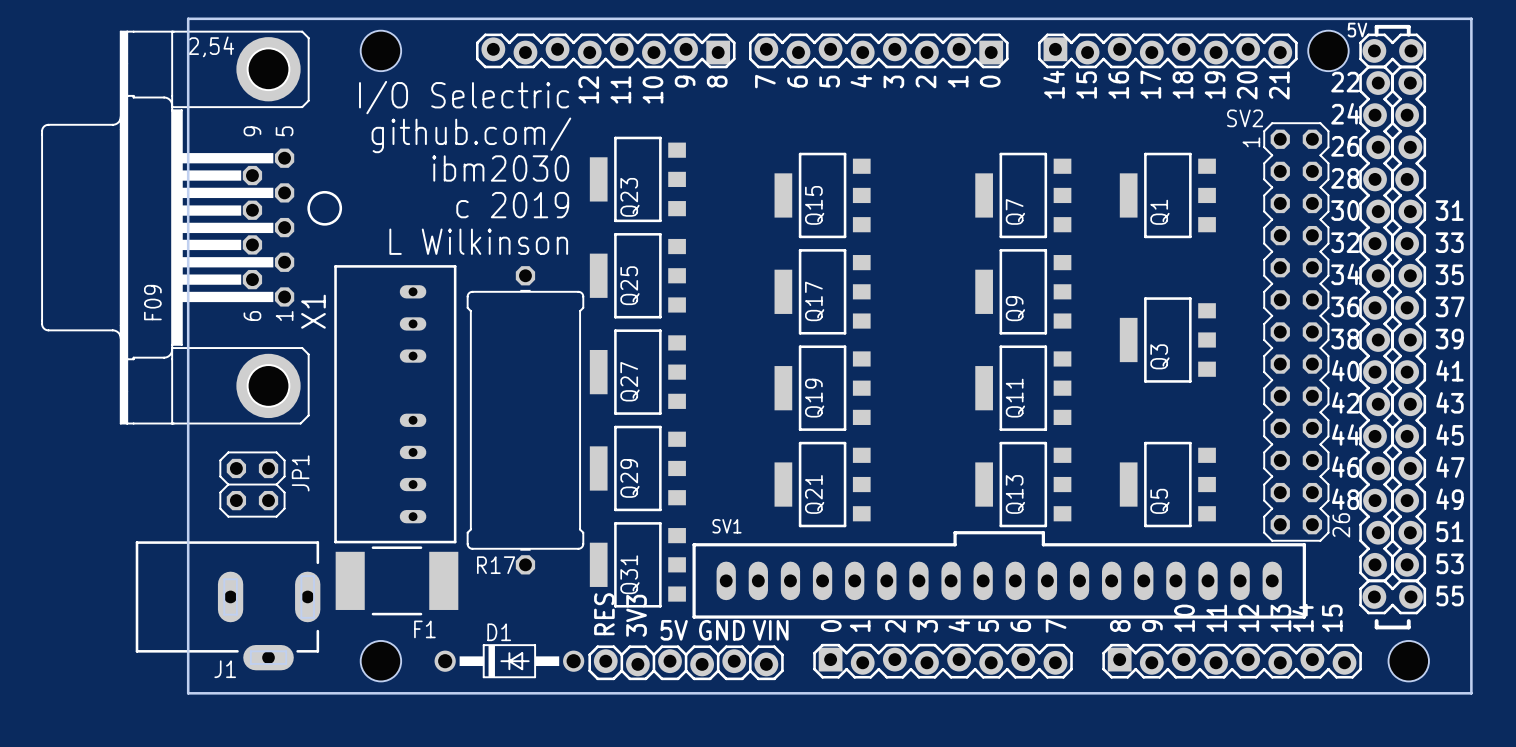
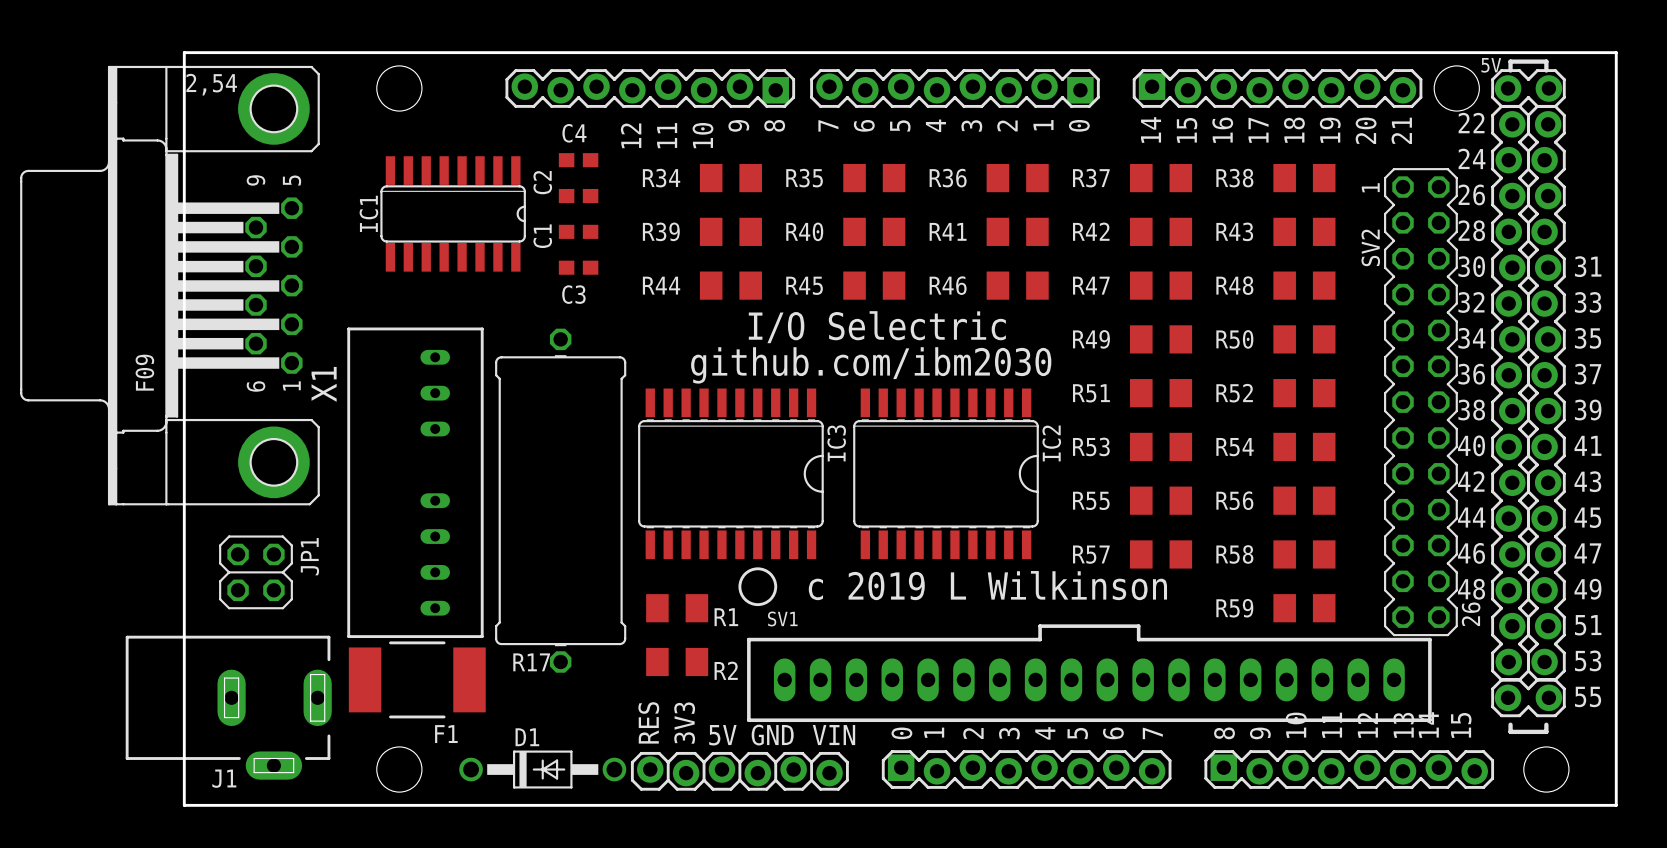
text: I/O Selectric (464, 97) -> none
C4: none -> (578, 160)
SV2 name rotation: 0° (1245, 118) -> 90° counterclockwise (1370, 247)
SV2 name position: SV2 (1245, 118) -> SV2 (1370, 247)
R34: none -> (730, 178)
R35: none -> (874, 178)
R36: none -> (1017, 178)
R37: none -> (1161, 178)
R38: none -> (1304, 178)
text: github.com/ (471, 135) -> none
C2: none -> (578, 196)
IC1: none -> (453, 213)
text: ibm2030 (500, 168) -> none
C1: none -> (578, 231)
Q23: (637, 179) -> none
R39: none -> (730, 231)
R40: none -> (874, 231)
R41: none -> (1017, 231)
R42: none -> (1161, 231)
R43: none -> (1304, 231)
drawing: [307, 190, 343, 226] -> none
Q15: (822, 195) -> none
Q7: (1023, 195) -> none
Q1: (1167, 195) -> none
text: c 2019 (512, 205) -> none
C3: none -> (578, 267)
R44: none -> (730, 285)
R45: none -> (874, 285)
R46: none -> (1017, 285)
R47: none -> (1161, 285)
R48: none -> (1304, 285)
text: L Wilkinson (478, 241) -> none
text: none -> I/O Selectric (877, 327)
Q25: (637, 275) -> none
R49: none -> (1161, 339)
R50: none -> (1304, 339)
Q17: (822, 291) -> none
Q9: (1023, 291) -> none
text: none -> github.com/ibm2030 (871, 365)
R51: none -> (1161, 393)
R52: none -> (1304, 393)
Q3: (1167, 340) -> none
Q27: (637, 372) -> none
R53: none -> (1161, 446)
R54: none -> (1304, 446)
Q19: (822, 388) -> none
Q11: (1023, 388) -> none
IC3: none -> (730, 473)
IC2: none -> (945, 473)
R55: none -> (1161, 500)
R56: none -> (1304, 500)
Q29: (637, 468) -> none
R57: none -> (1161, 554)
R58: none -> (1304, 554)
drawing: none -> [738, 567, 778, 607]
Q21: (822, 484) -> none
Q13: (1023, 484) -> none
Q5: (1167, 484) -> none
text: none -> c 2019 L Wilkinson (987, 585)
R1: none -> (677, 608)
R59: none -> (1304, 608)
R2: none -> (677, 661)
Q31: (637, 564) -> none

